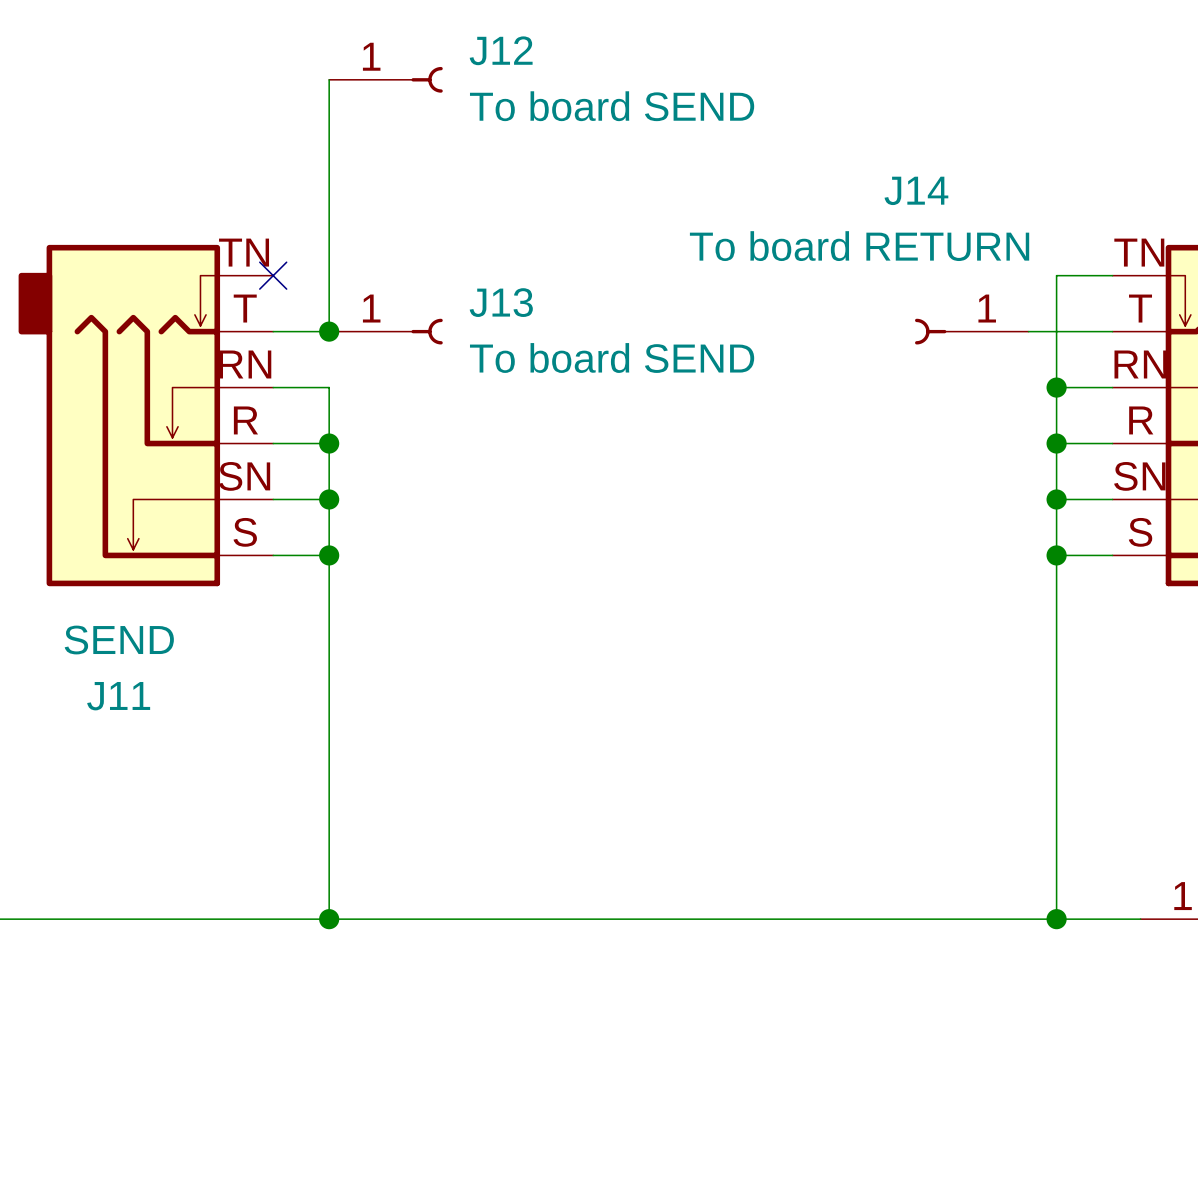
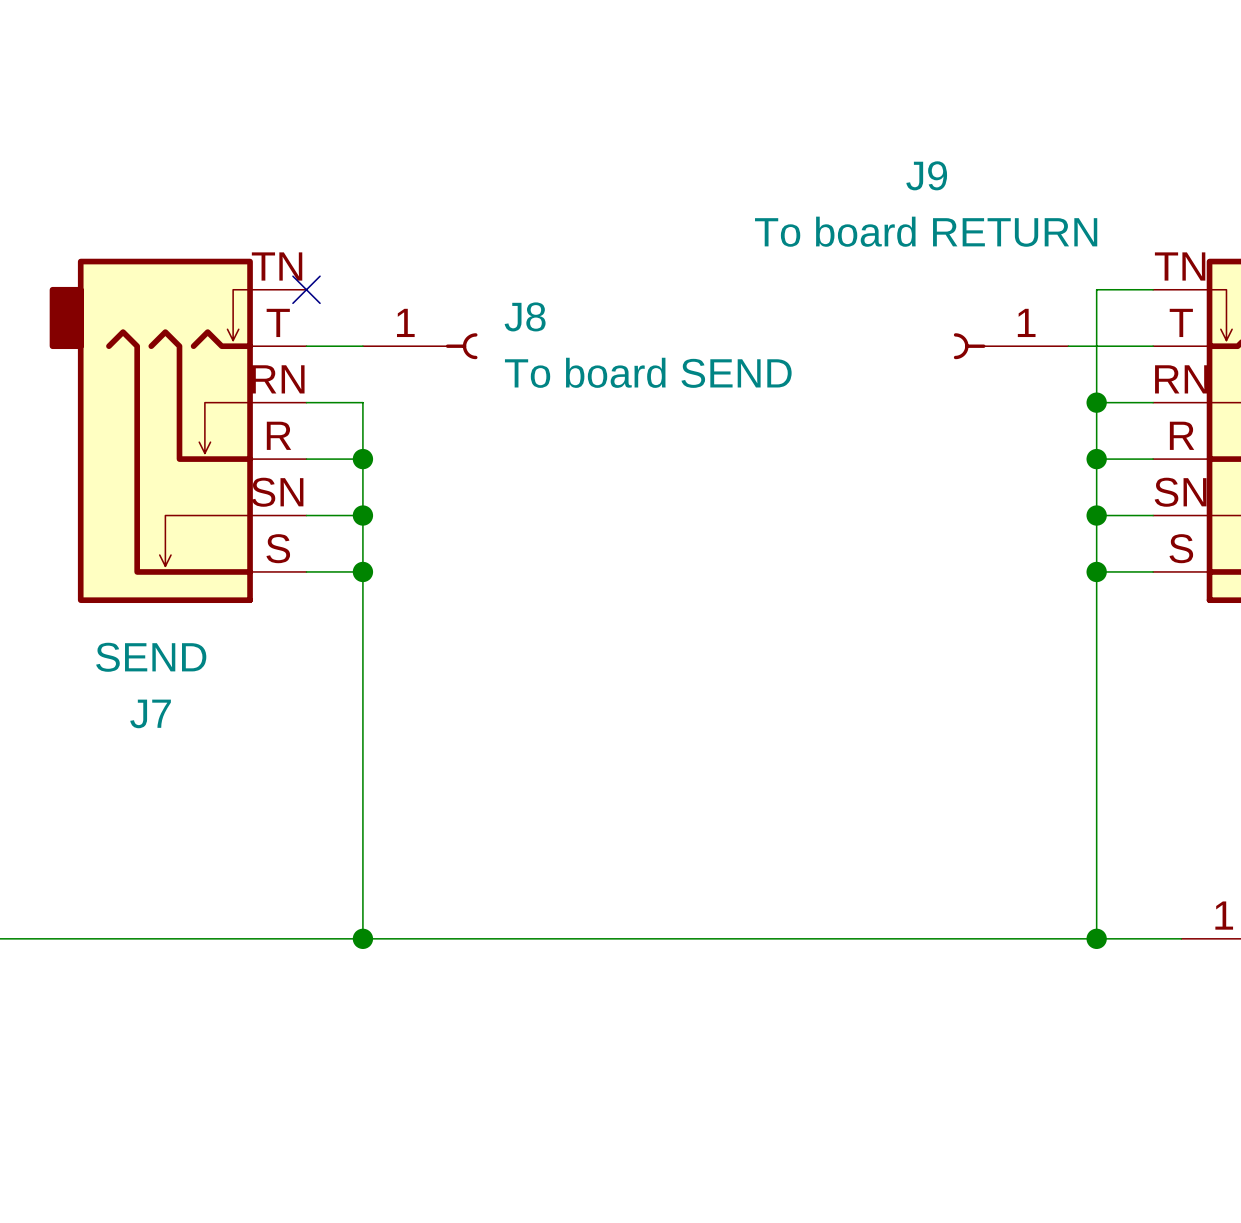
wire: (329, 79) (329, 331) -> none
J12: To board SEND (385, 79) -> none
J14 name: J14 (916, 190) -> J9 (926, 175)
J14 value position: To board RETURN (859, 246) -> To board RETURN (926, 231)
J13 name: J13 (501, 302) -> J8 (525, 316)
junction: (329, 331) -> none
J11 name: J11 (118, 696) -> J7 (150, 713)

